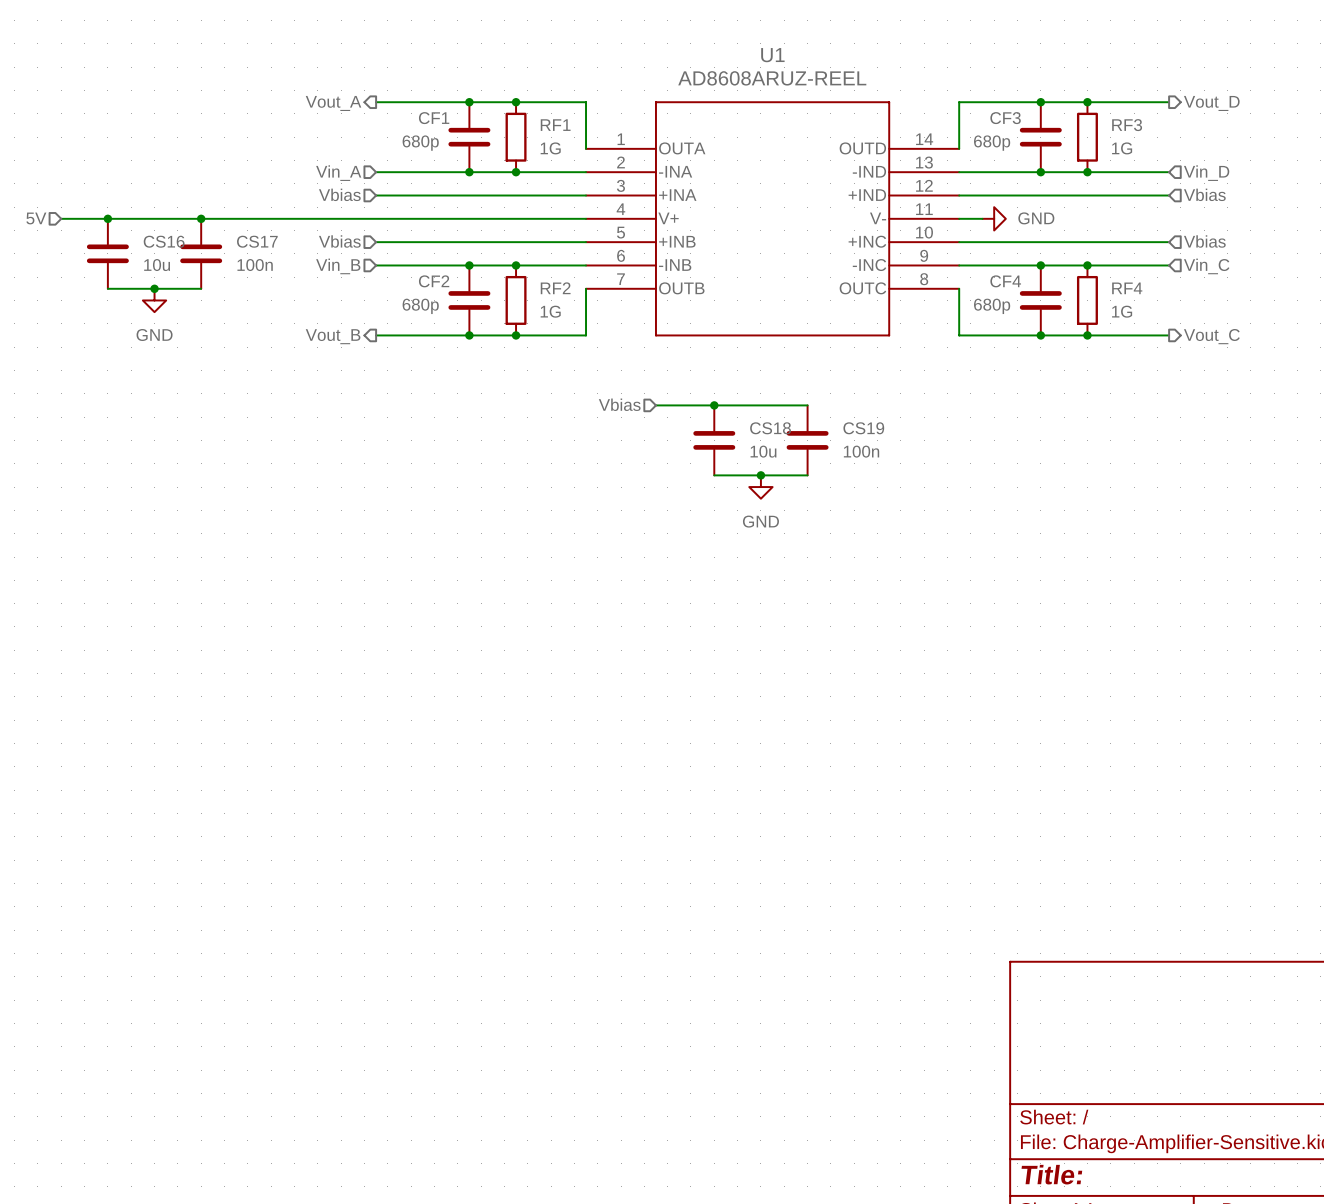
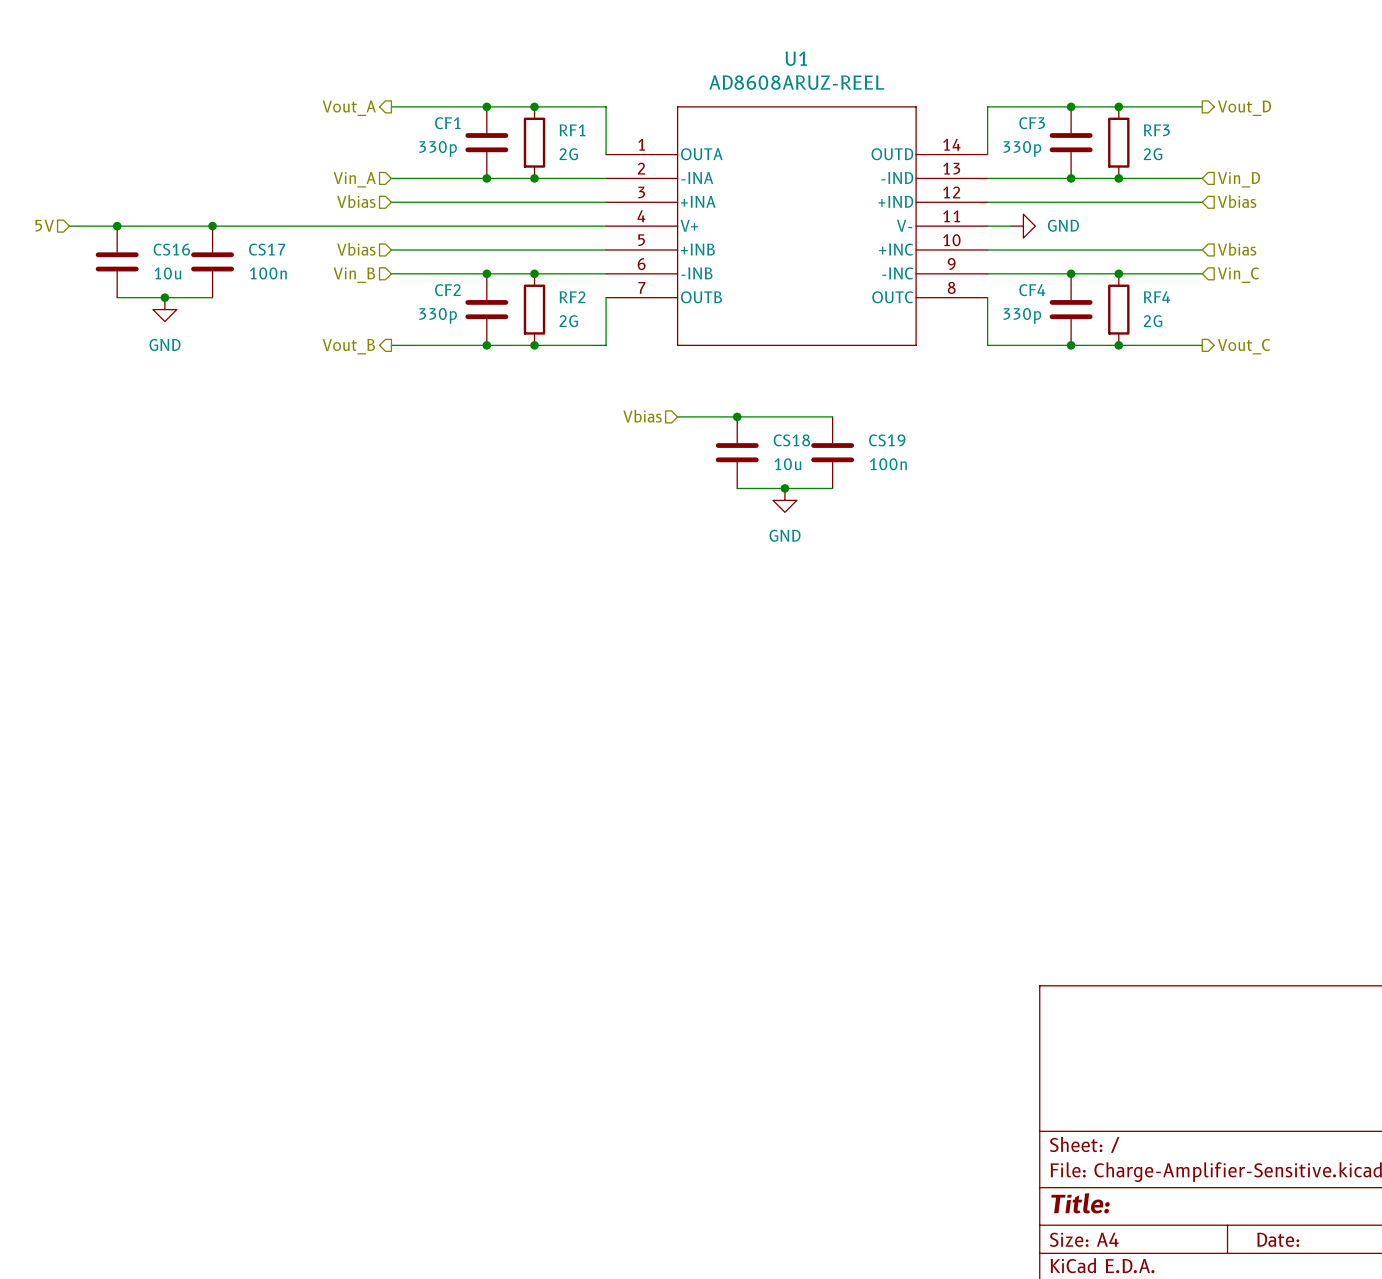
CF1 value: 680p (420, 143) -> 330p (438, 148)
CF3 value: 680p (992, 143) -> 330p (1022, 148)
RF1 value: 1G (550, 148) -> 2G (568, 154)
RF3 value: 1G (1122, 148) -> 2G (1153, 154)
CF2 value: 680p (420, 306) -> 330p (438, 315)
CF4 value: 680p (992, 306) -> 330p (1022, 315)
RF2 value: 1G (550, 311) -> 2G (568, 321)
RF4 value: 1G (1122, 311) -> 2G (1153, 321)

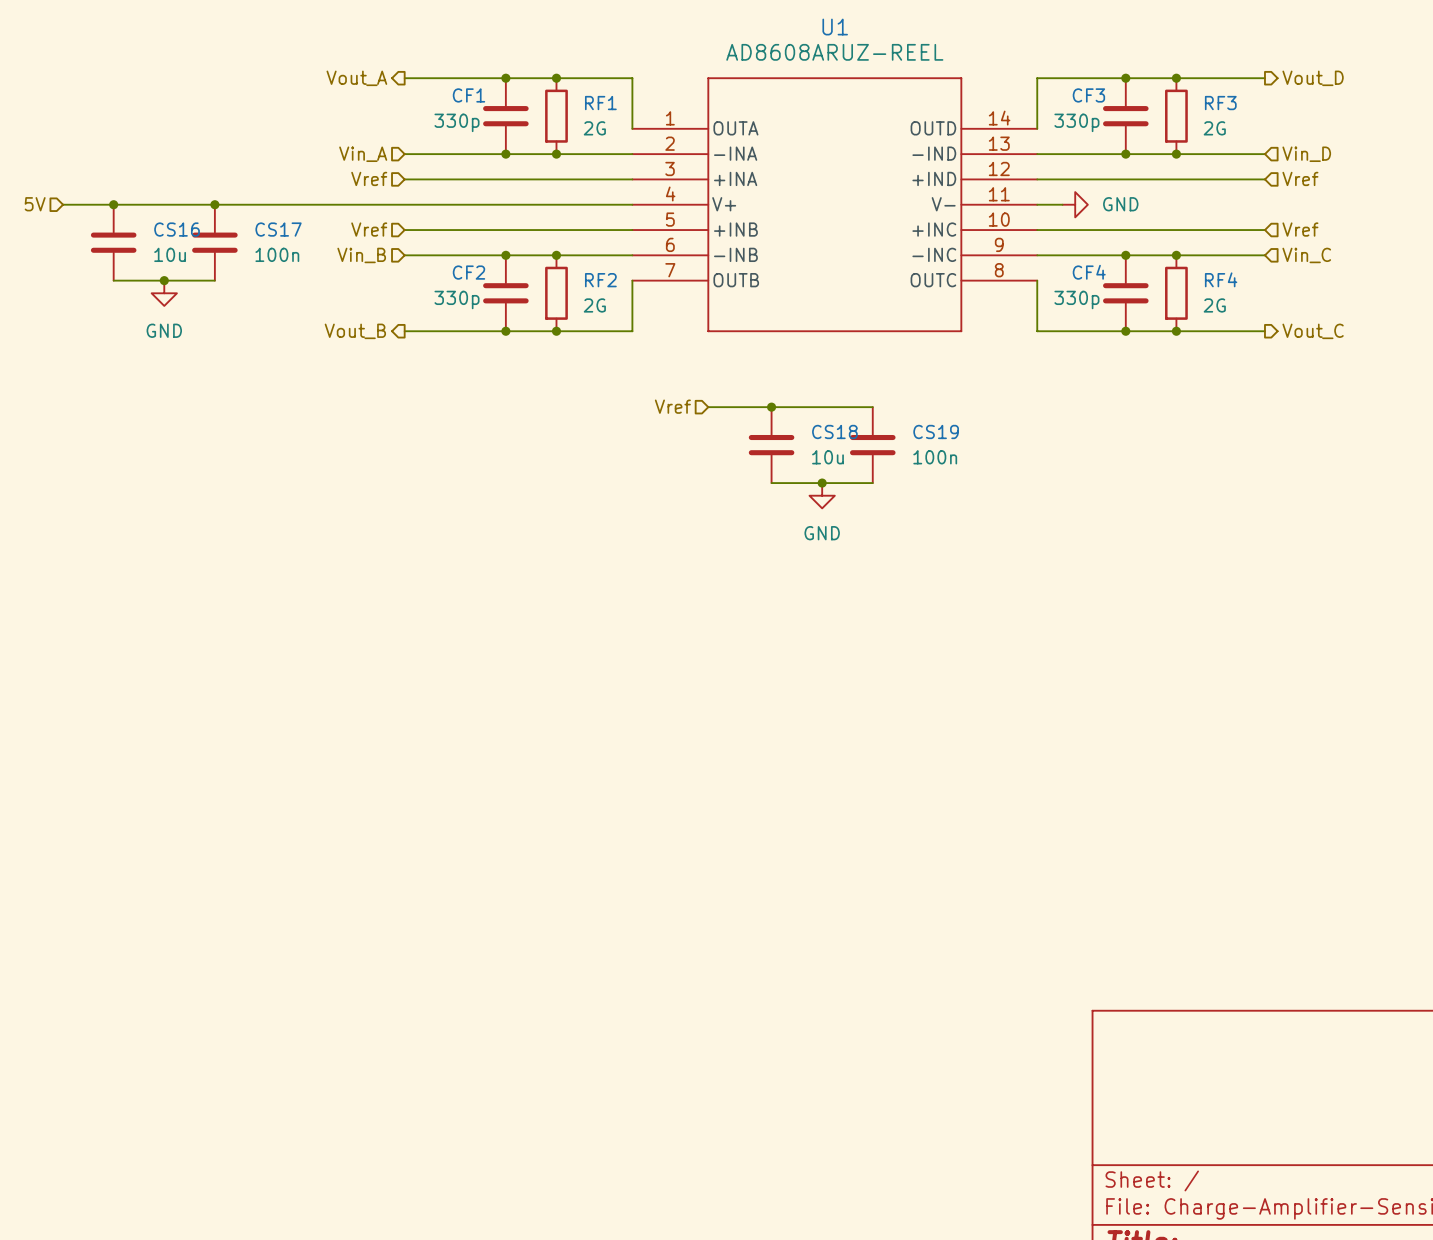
hierarchical label: Vbias (356, 201) -> Vref (369, 178)
hierarchical label: Vbias (1237, 201) -> Vref (1300, 178)
hierarchical label: Vbias (356, 249) -> Vref (369, 229)
hierarchical label: Vbias (1237, 249) -> Vref (1300, 229)
hierarchical label: Vbias (642, 416) -> Vref (672, 406)

